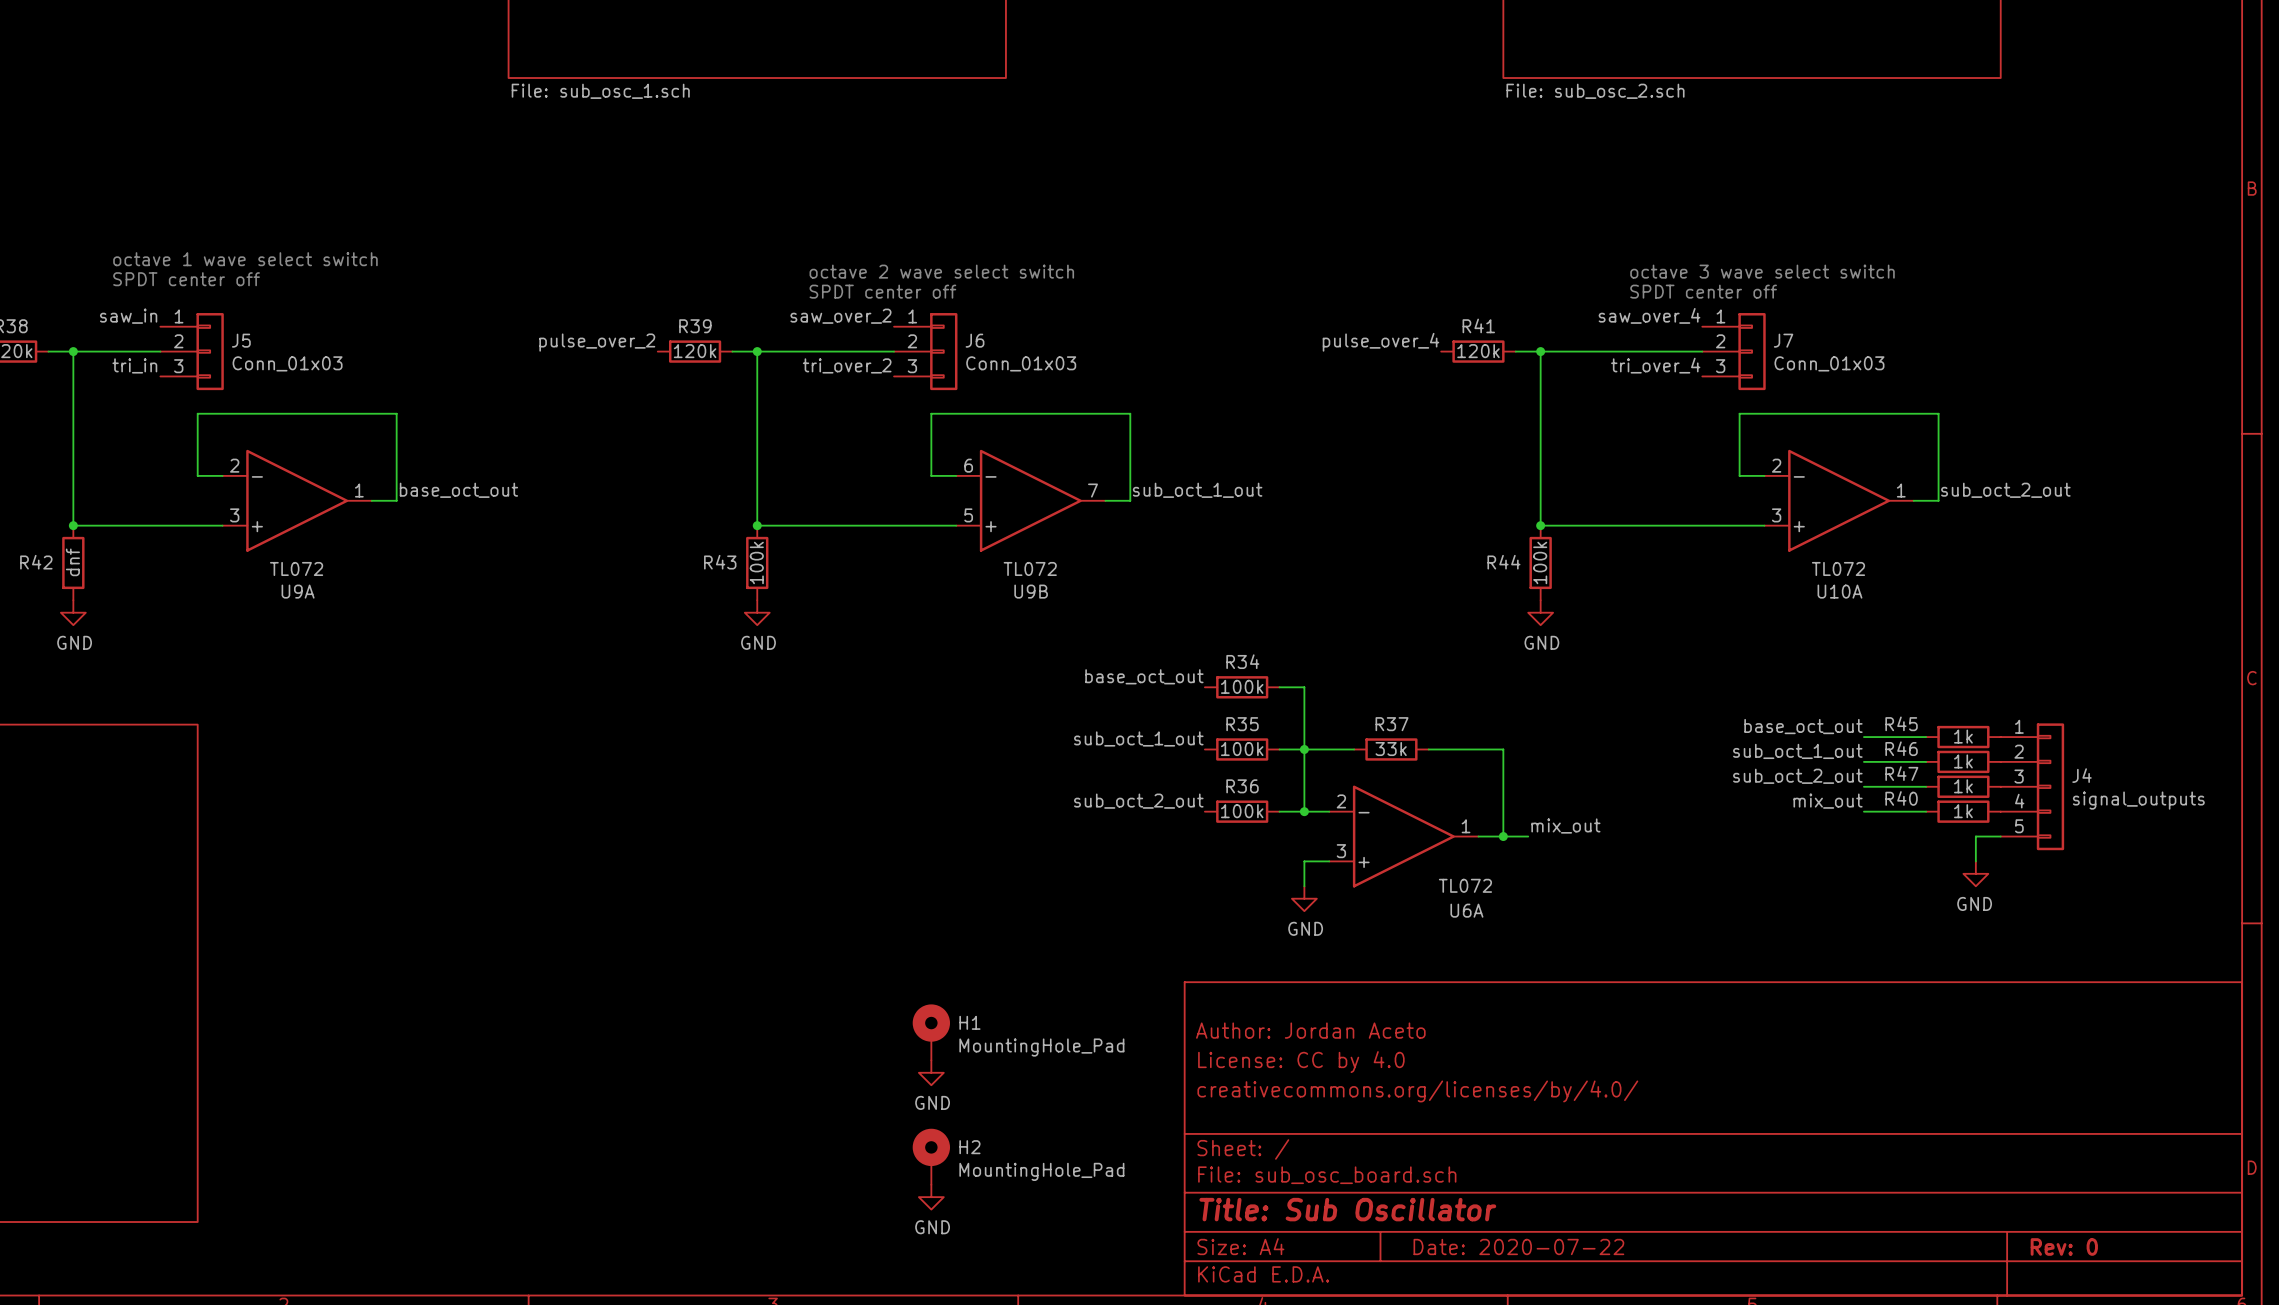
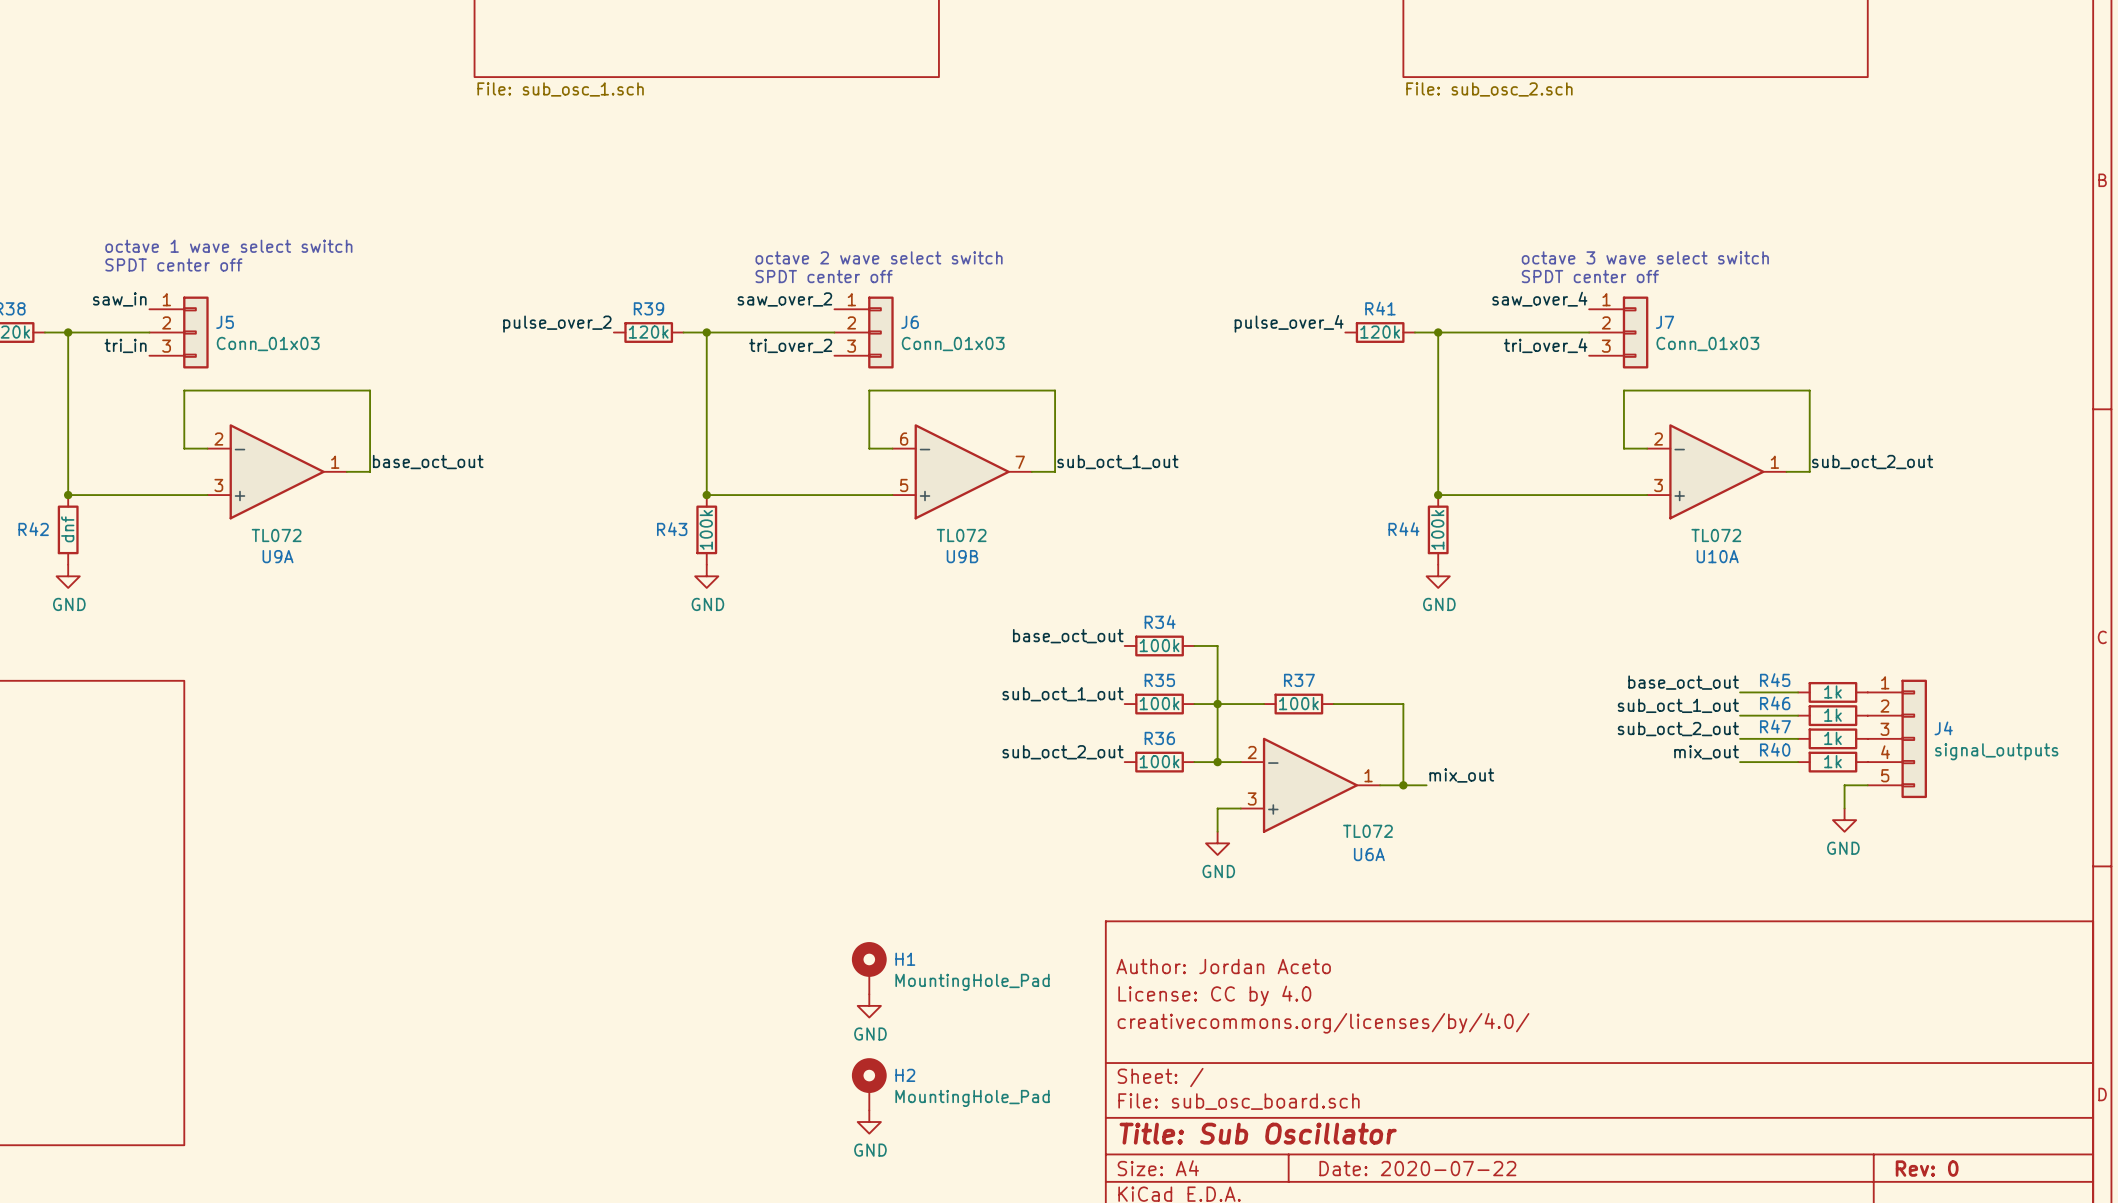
R37 value: 33k (1391, 749) -> 100k (1298, 703)

